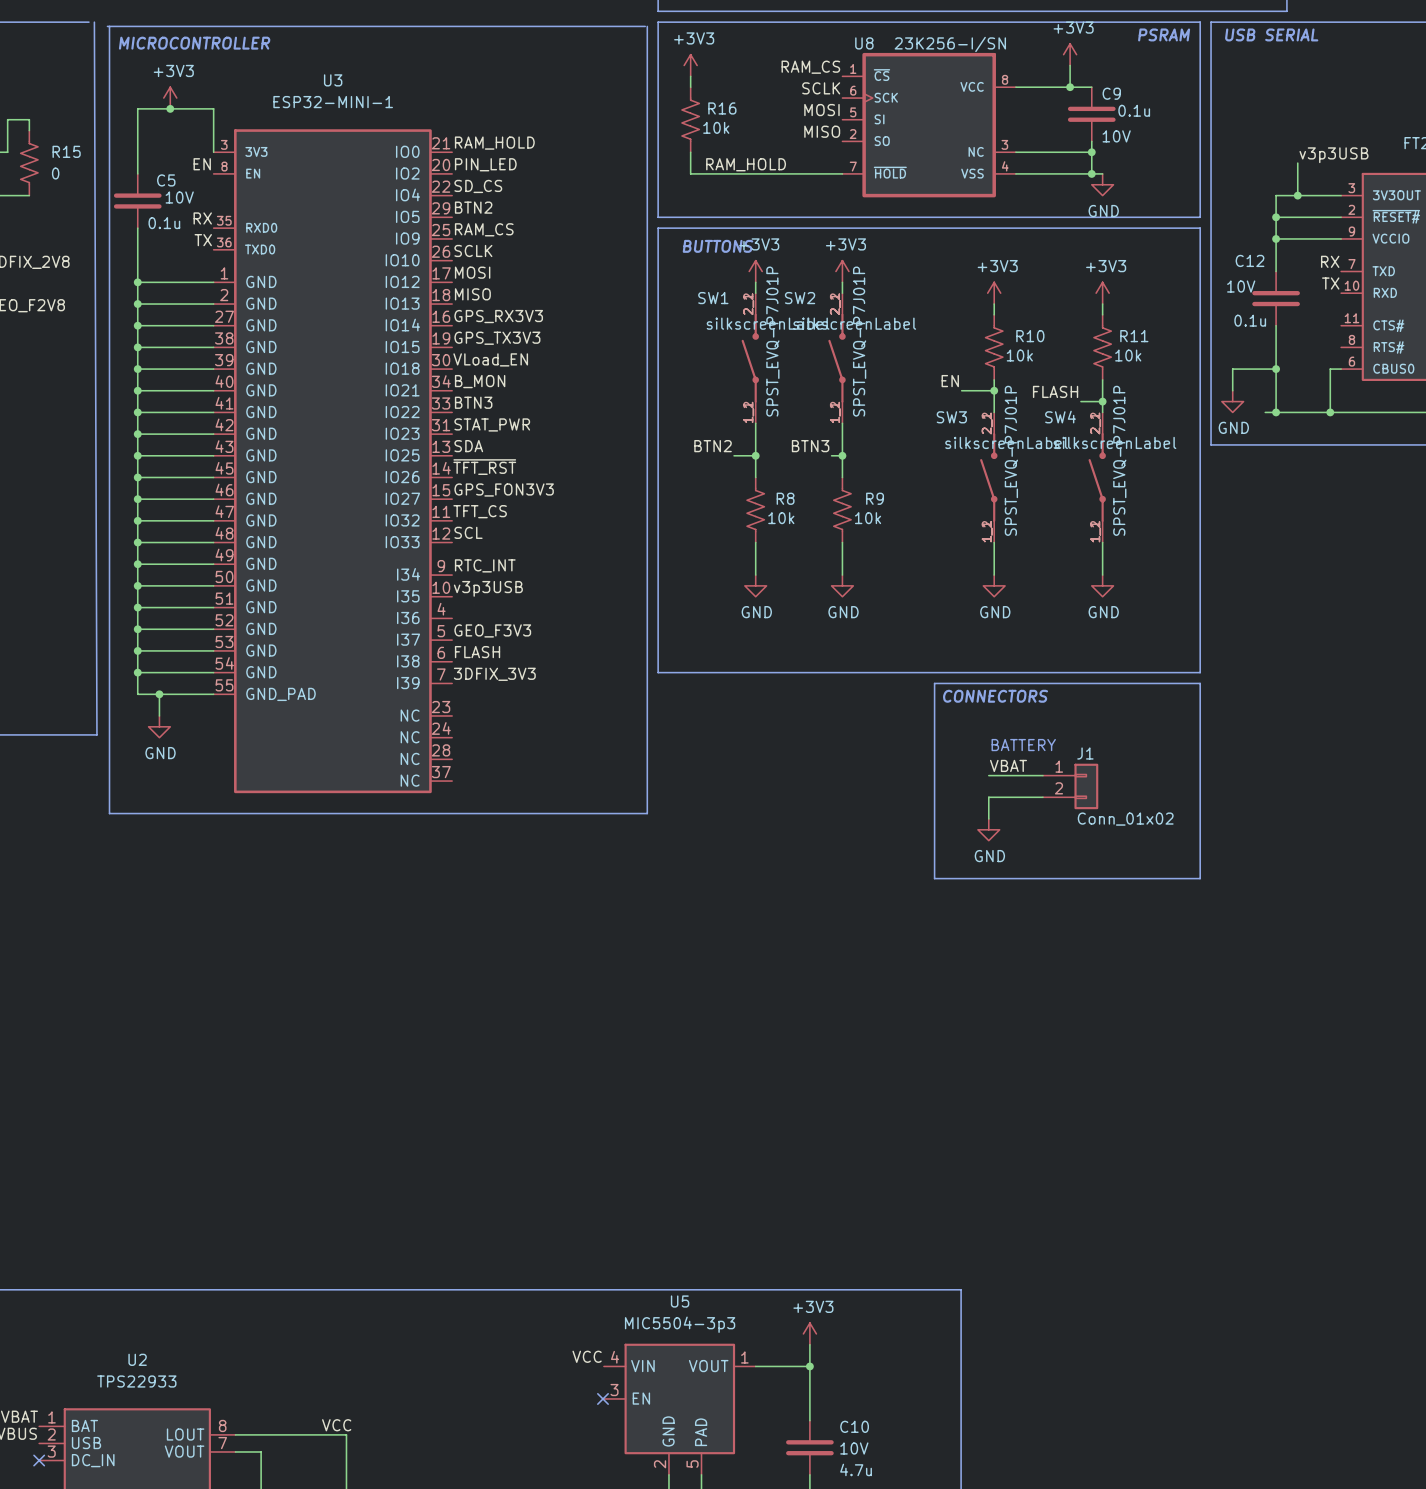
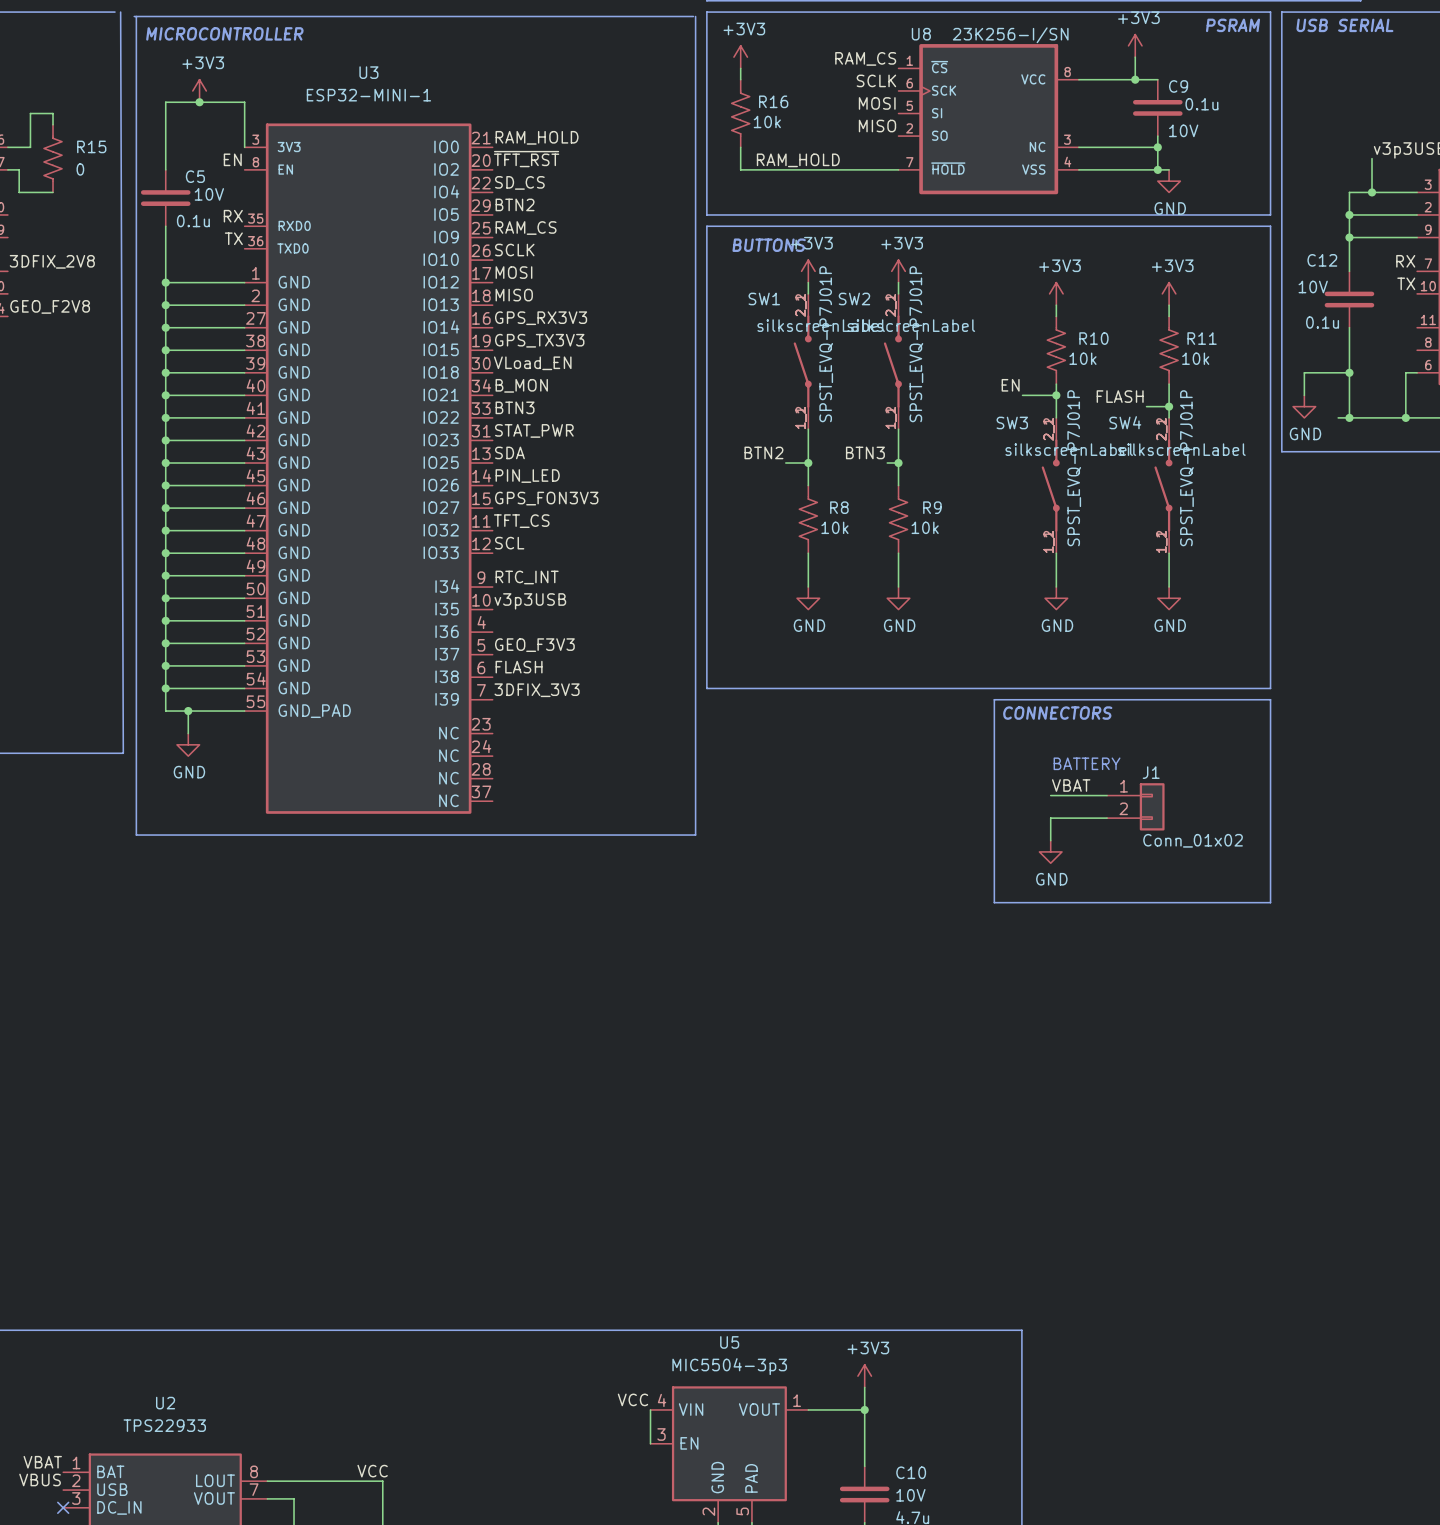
label: PIN_LED (485, 164) -> ~{TFT_RST} (526, 159)
label: ~{TFT_RST} (484, 467) -> PIN_LED (527, 476)
wire: none -> (650, 1409) (650, 1443)
no-connect mark: (602, 1398) -> none

